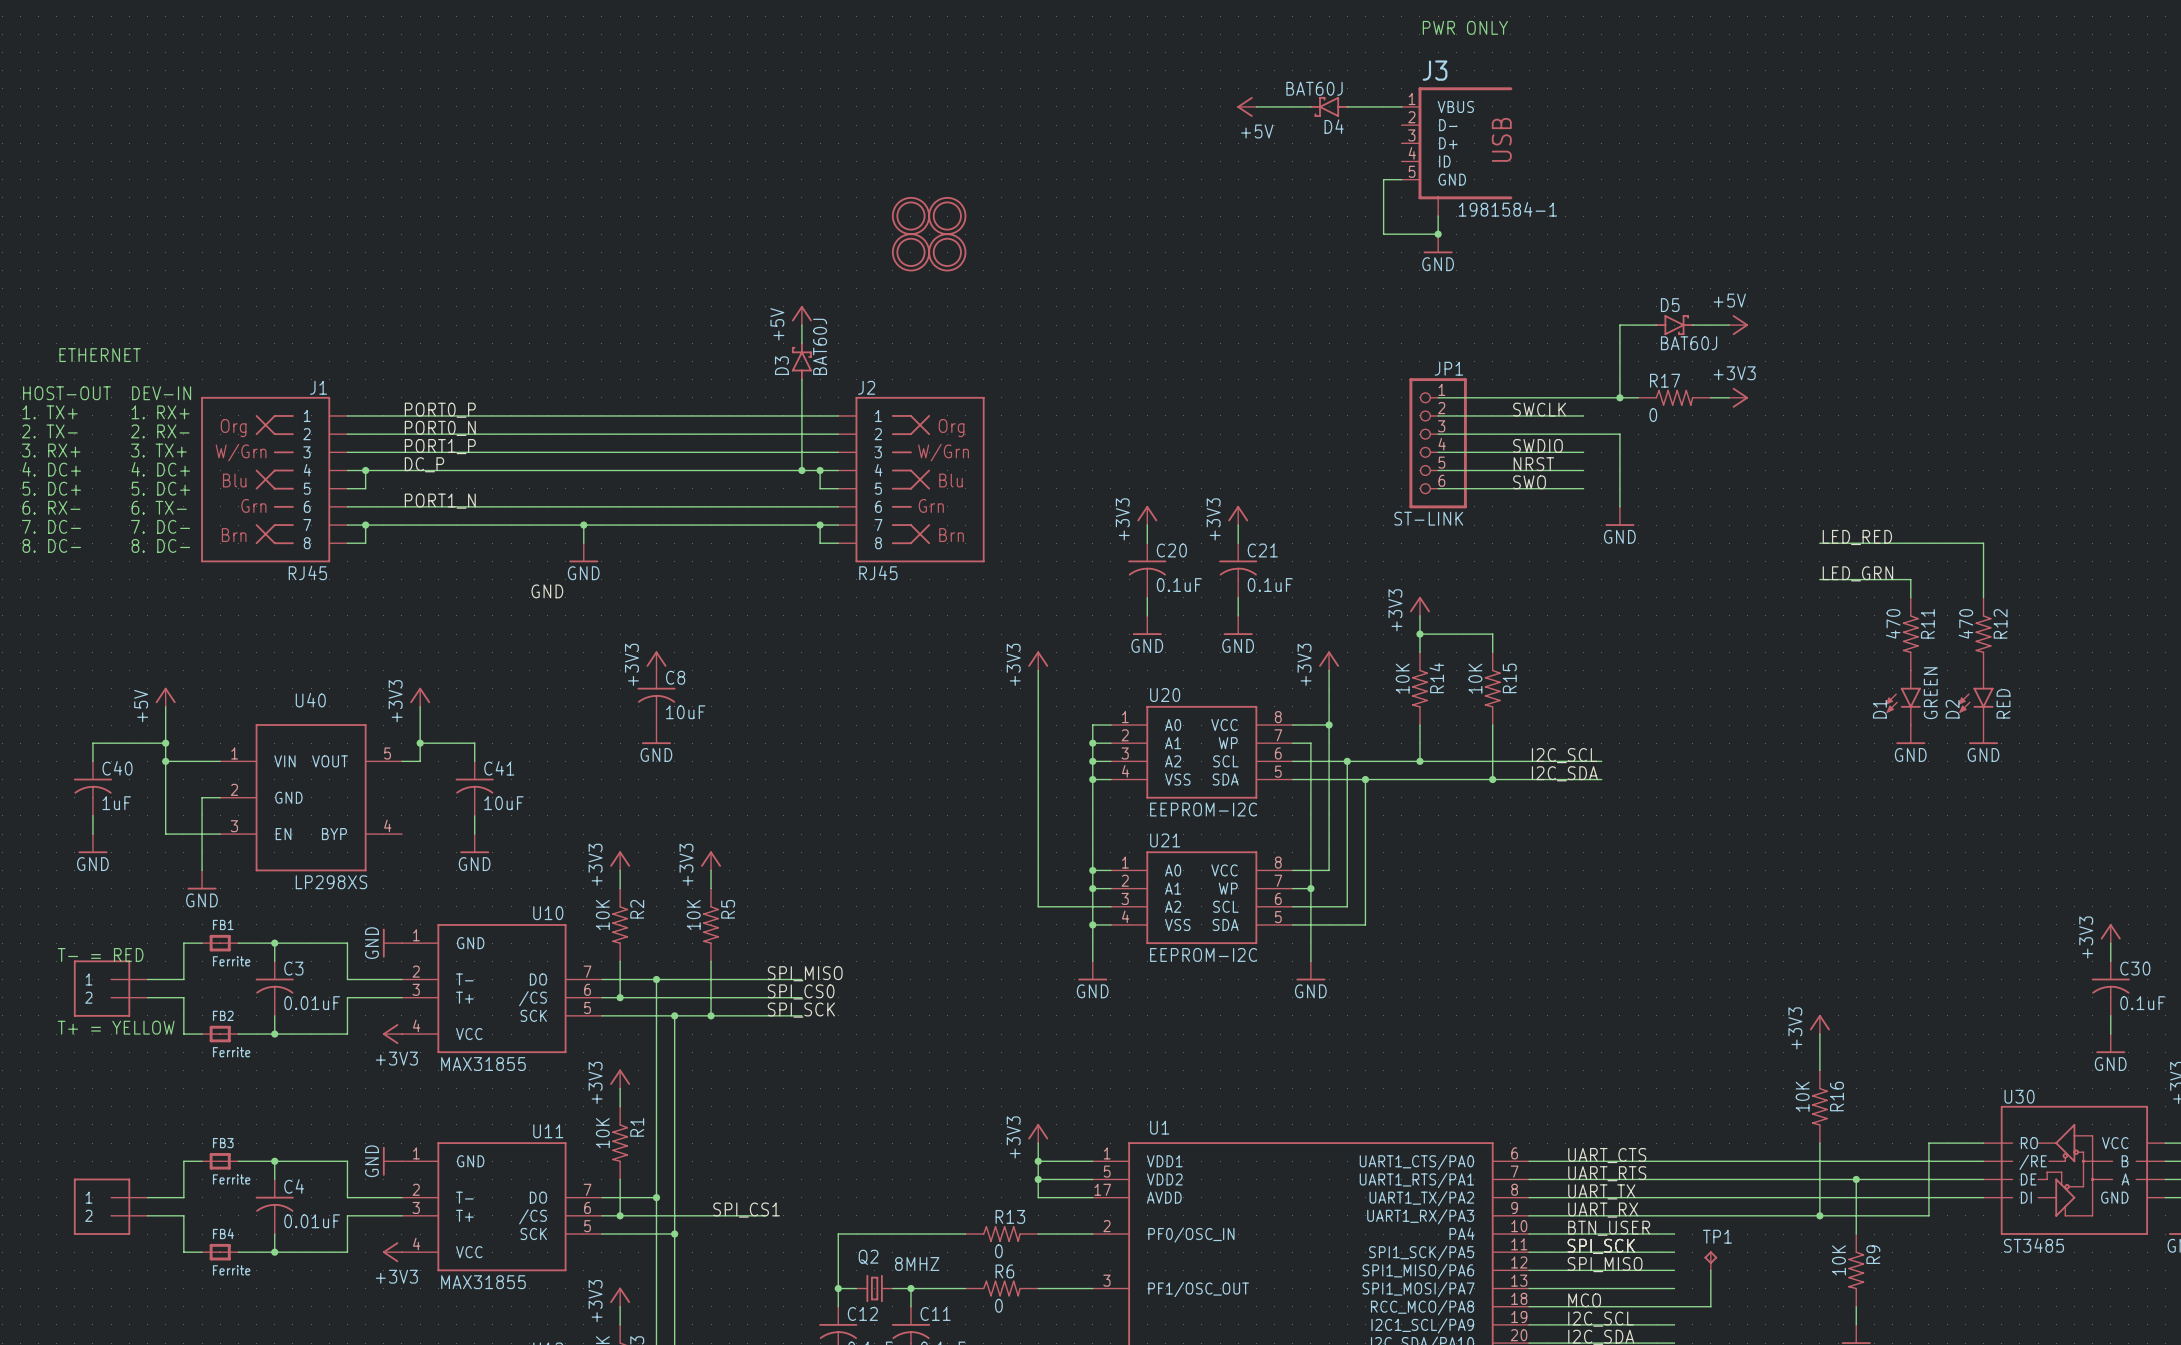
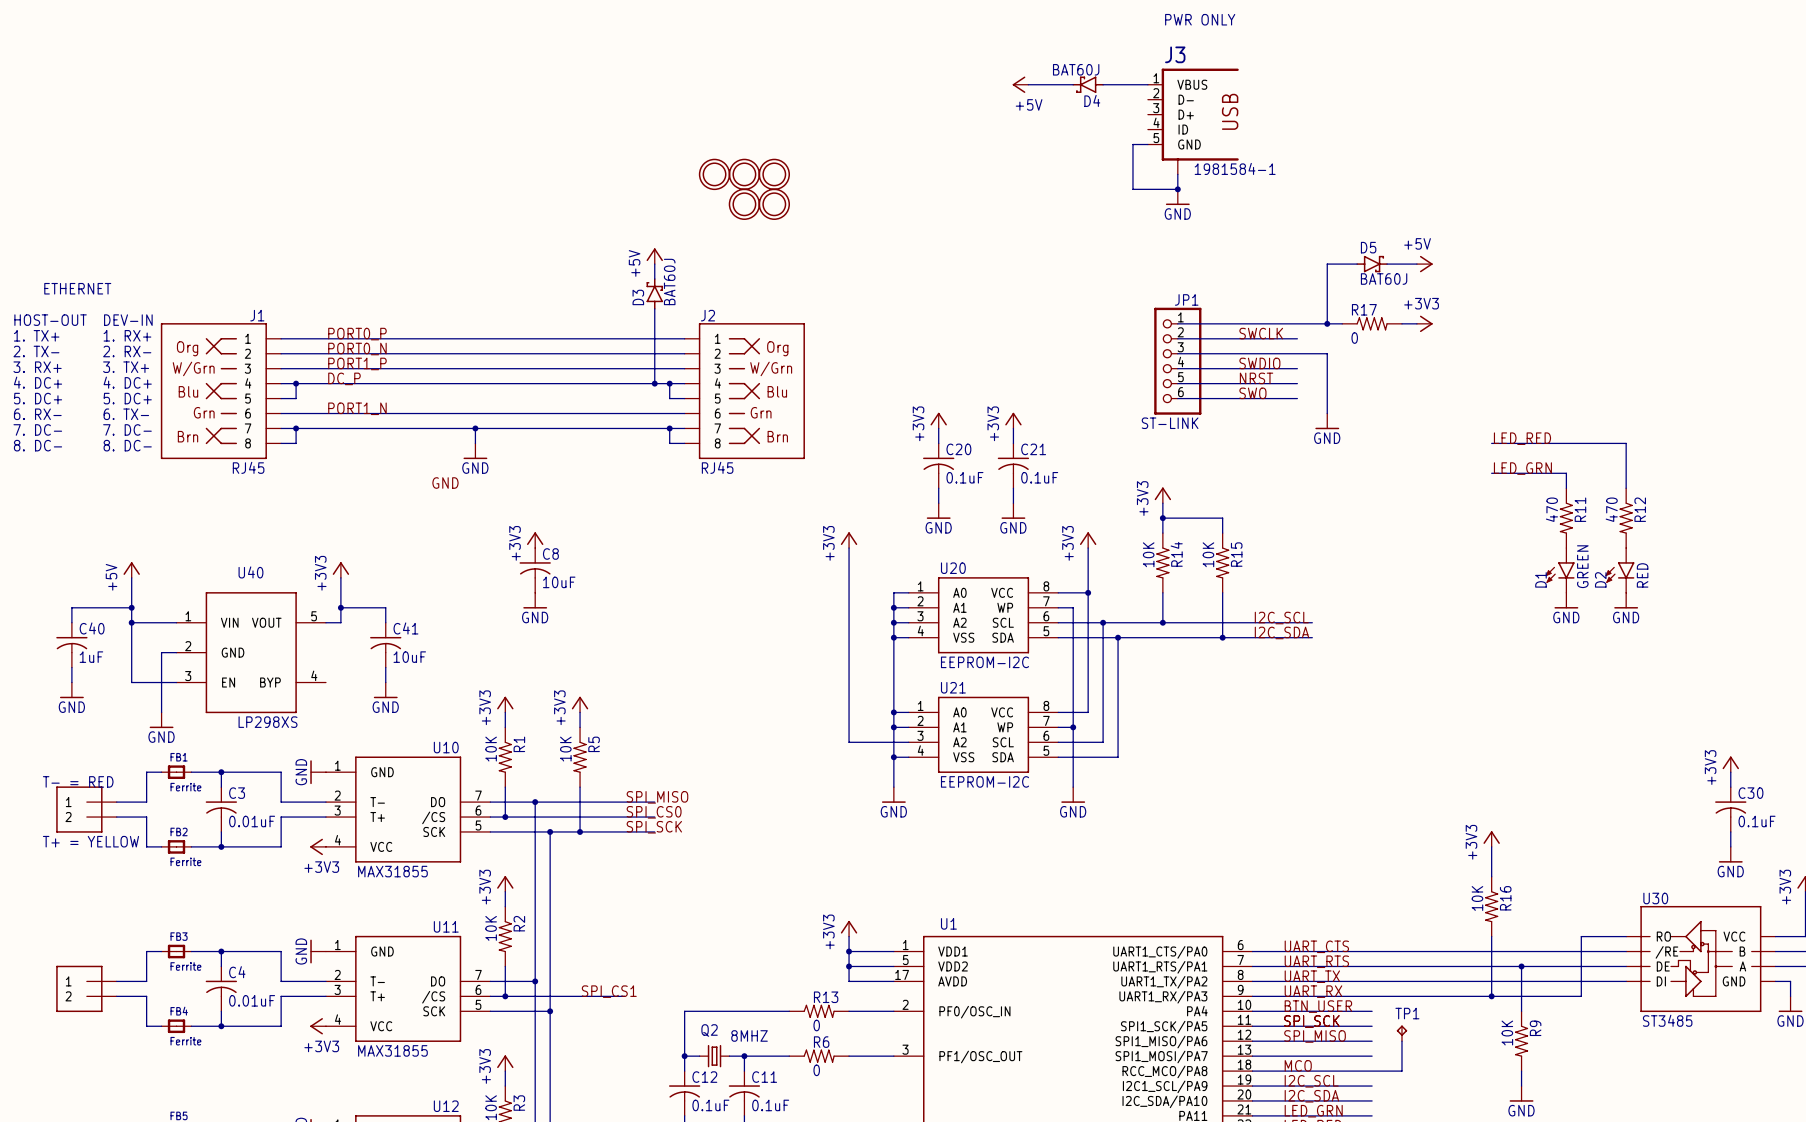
part: none -> (714, 174)
R2 name: R2 (637, 909) -> R1 (519, 744)
R1 name: R1 (637, 1127) -> R2 (519, 923)

